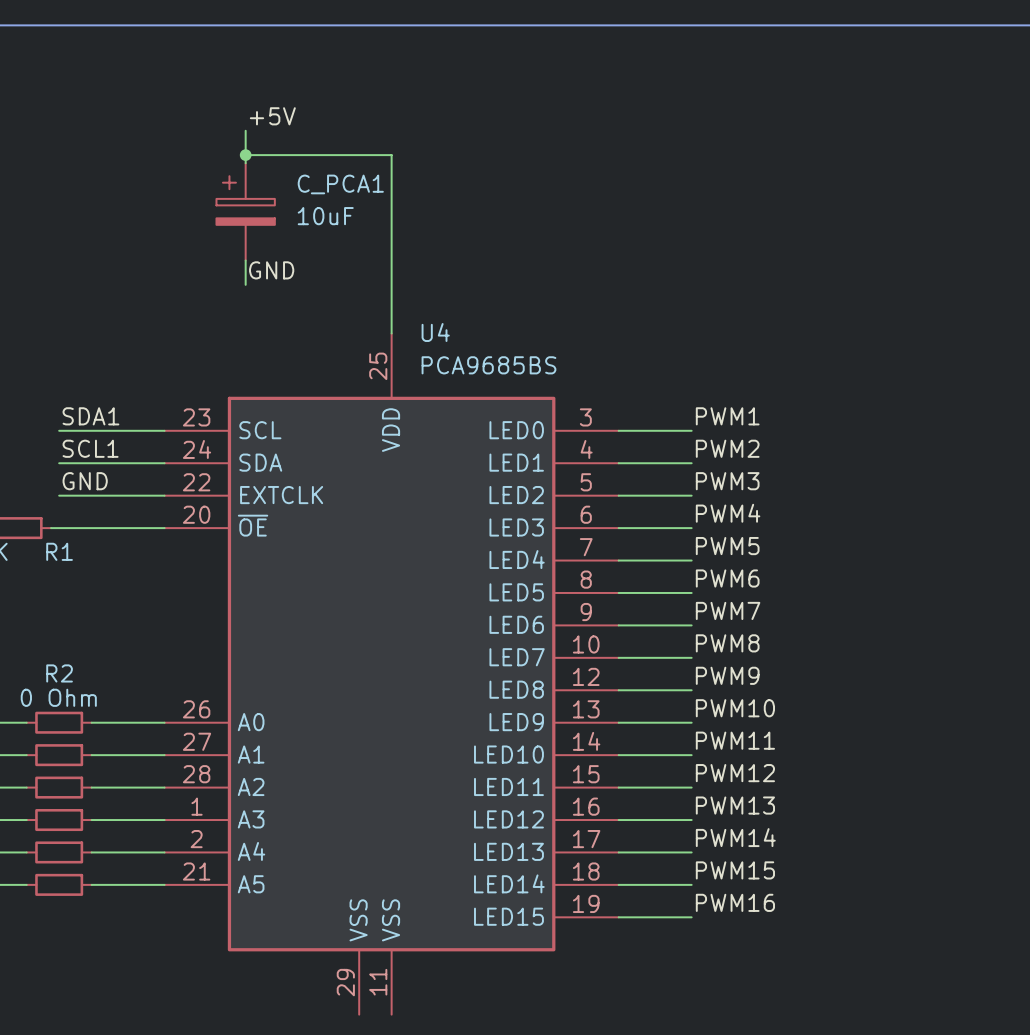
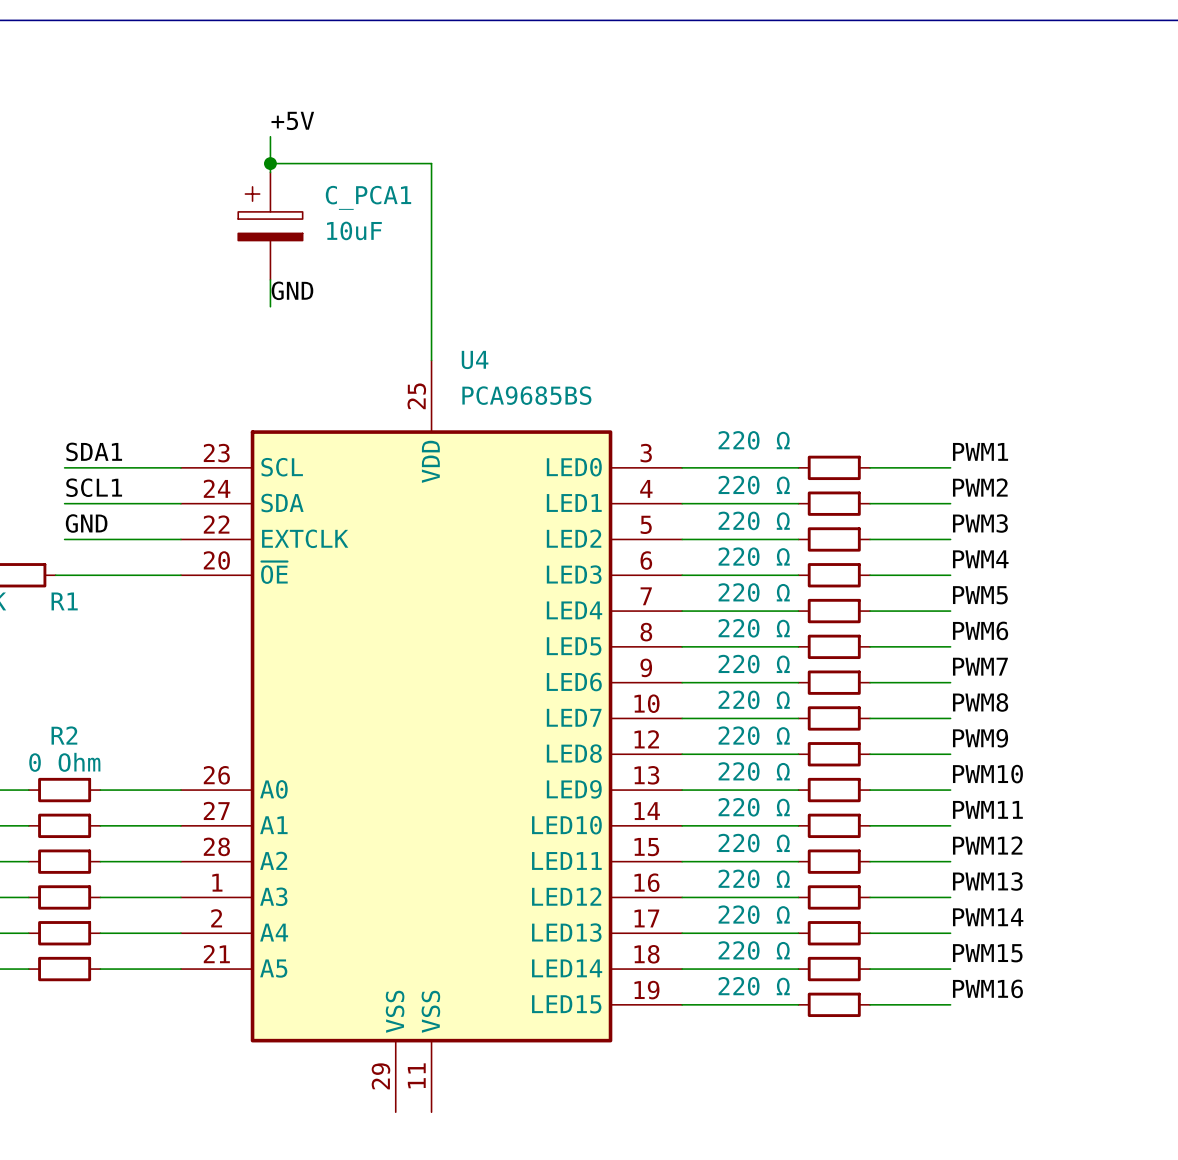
label position: PWM1 (727, 416) -> PWM1 (980, 451)
wire: none -> (762, 467) (798, 467)
part: none -> 220 Ω (834, 467)
wire: none -> (870, 467) (950, 467)
label position: PWM2 (727, 448) -> PWM2 (980, 487)
wire: none -> (762, 503) (798, 503)
part: none -> 220 Ω (834, 503)
wire: none -> (870, 503) (950, 503)
label position: PWM3 (727, 481) -> PWM3 (980, 523)
wire: none -> (762, 539) (798, 539)
part: none -> 220 Ω (834, 539)
wire: none -> (870, 539) (950, 539)
label position: PWM4 (728, 513) -> PWM4 (980, 559)
wire: none -> (762, 575) (798, 575)
part: none -> 220 Ω (834, 575)
wire: none -> (870, 575) (950, 575)
label position: PWM5 (727, 546) -> PWM5 (980, 595)
wire: none -> (762, 611) (798, 611)
part: none -> 220 Ω (834, 611)
wire: none -> (870, 611) (950, 611)
label position: PWM6 (727, 578) -> PWM6 (980, 630)
wire: none -> (762, 646) (798, 646)
part: none -> 220 Ω (834, 646)
wire: none -> (870, 646) (950, 646)
label position: PWM7 (728, 610) -> PWM7 (980, 666)
wire: none -> (762, 682) (798, 682)
part: none -> 220 Ω (834, 682)
wire: none -> (870, 682) (950, 682)
label position: PWM8 (727, 643) -> PWM8 (980, 702)
wire: none -> (762, 718) (798, 718)
part: none -> 220 Ω (834, 718)
wire: none -> (870, 718) (950, 718)
label position: PWM9 (727, 675) -> PWM9 (980, 738)
wire: none -> (762, 754) (798, 754)
part: none -> 220 Ω (834, 754)
wire: none -> (870, 754) (950, 754)
label position: PWM10 (735, 708) -> PWM10 (987, 774)
wire: none -> (762, 790) (798, 790)
part: none -> 220 Ω (834, 790)
wire: none -> (870, 790) (950, 790)
label position: PWM11 (735, 740) -> PWM11 (987, 809)
wire: none -> (762, 825) (798, 825)
part: none -> 220 Ω (834, 825)
wire: none -> (870, 825) (950, 825)
label position: PWM12 (735, 773) -> PWM12 (987, 845)
wire: none -> (762, 861) (798, 861)
part: none -> 220 Ω (834, 861)
wire: none -> (870, 861) (950, 861)
label position: PWM13 (735, 805) -> PWM13 (987, 881)
wire: none -> (762, 897) (798, 897)
part: none -> 220 Ω (834, 897)
wire: none -> (870, 897) (950, 897)
label position: PWM14 (735, 837) -> PWM14 (988, 917)
wire: none -> (762, 933) (798, 933)
part: none -> 220 Ω (834, 933)
wire: none -> (870, 933) (950, 933)
label position: PWM15 (735, 870) -> PWM15 (987, 953)
wire: none -> (762, 969) (798, 969)
part: none -> 220 Ω (834, 969)
wire: none -> (870, 969) (950, 969)
label position: PWM16 (735, 902) -> PWM16 (987, 988)
wire: none -> (762, 1004) (798, 1004)
part: none -> 220 Ω (834, 1004)
wire: none -> (870, 1004) (950, 1004)

